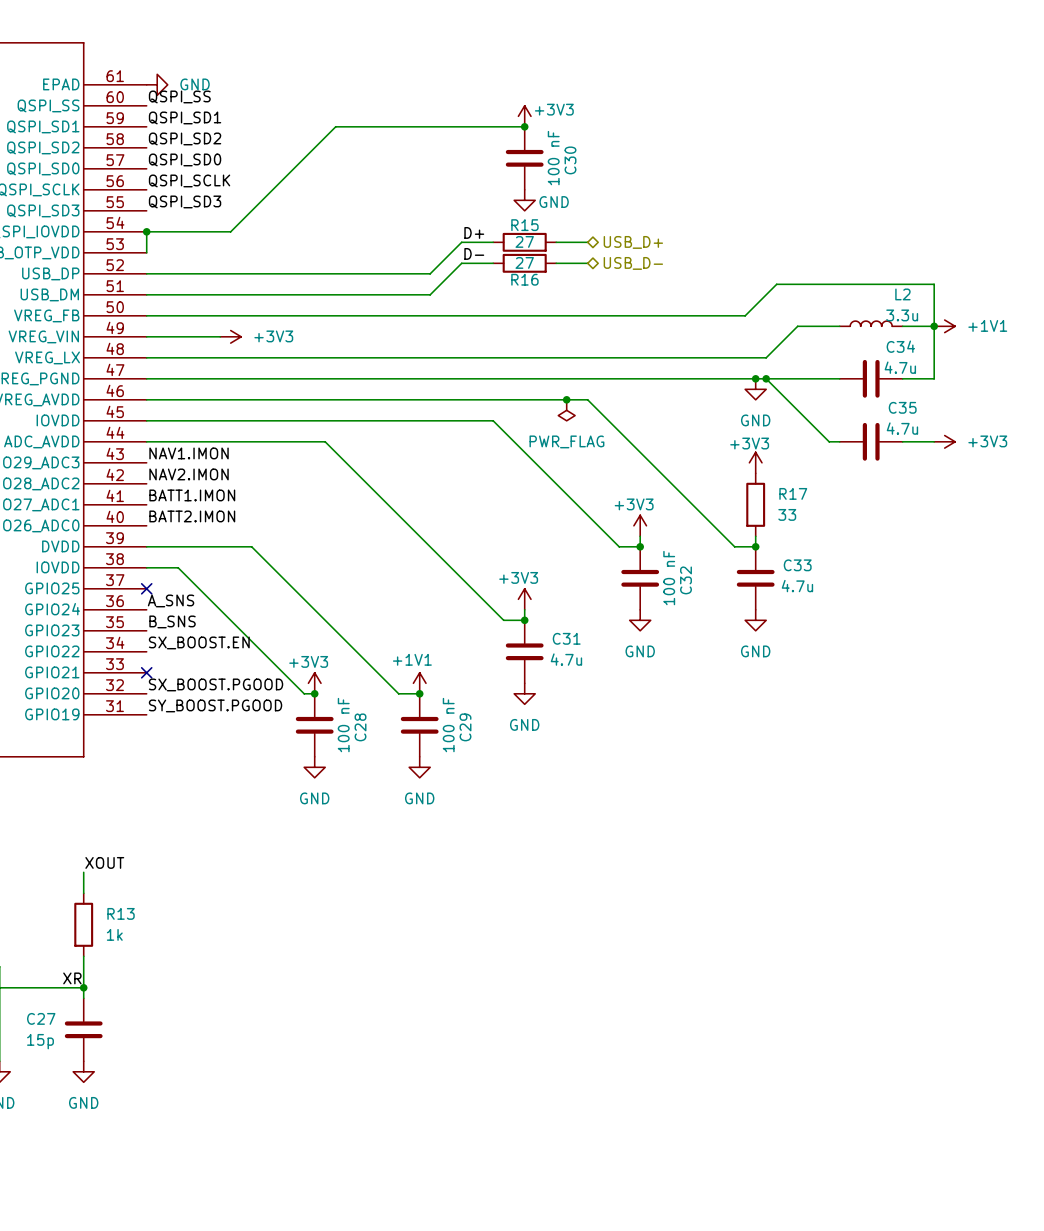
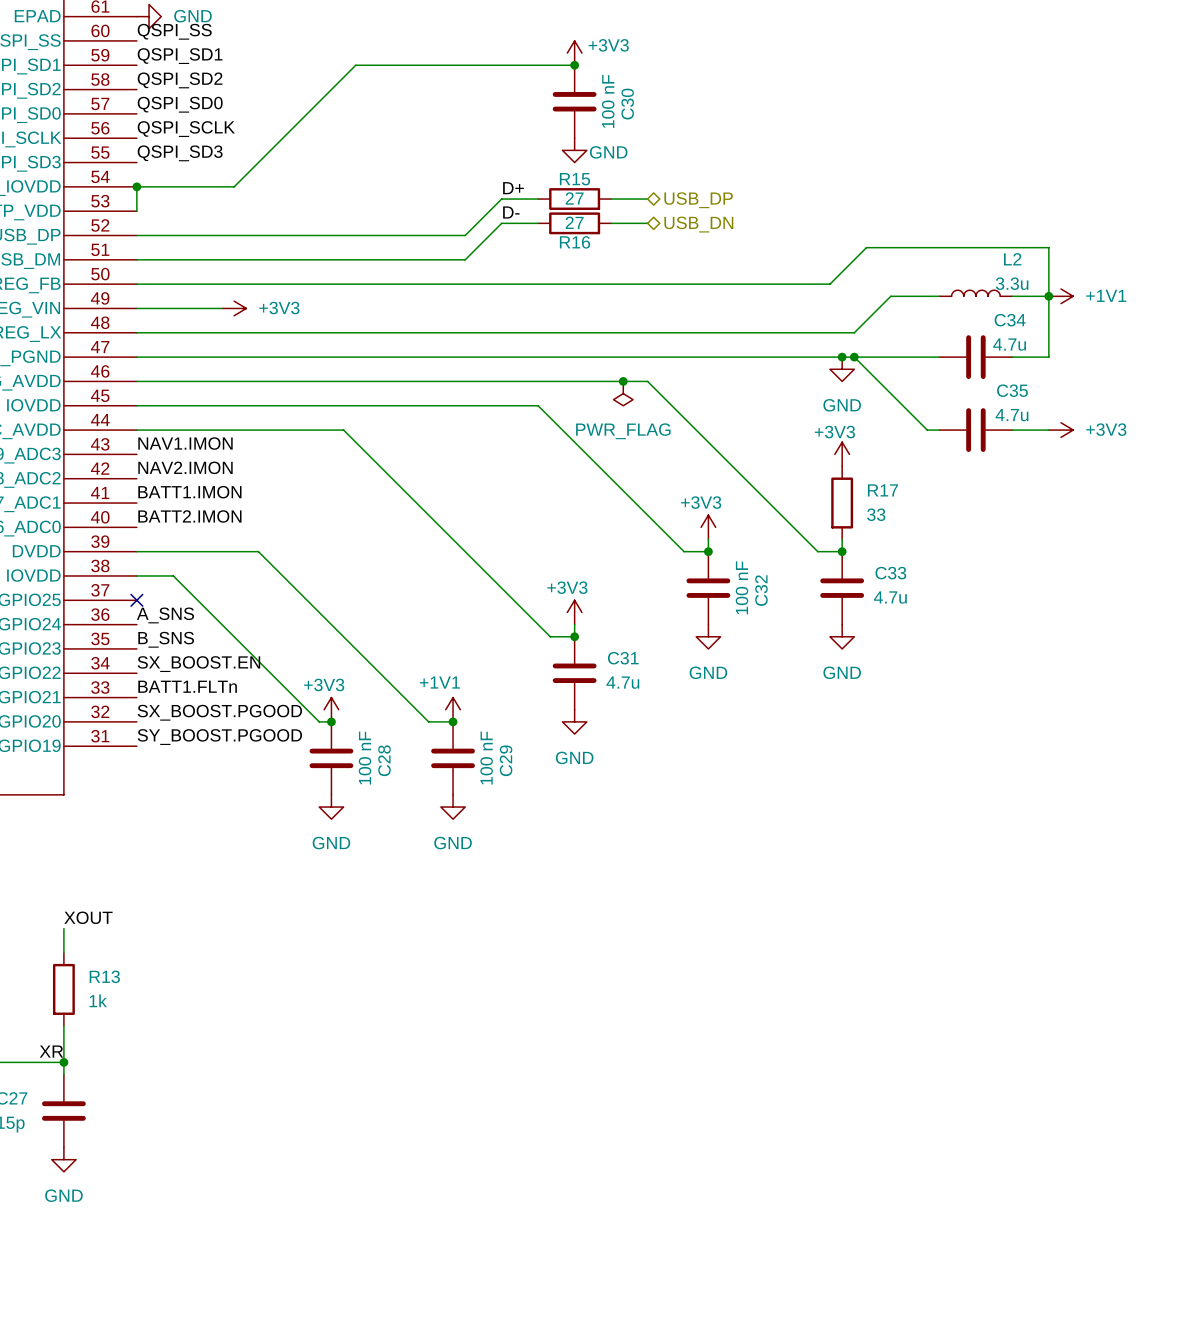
hierarchical label: USB_D+ (633, 242) -> USB_DP (698, 200)
hierarchical label: USB_D- (633, 263) -> USB_DN (698, 224)
label: none -> BATT1.FLTn (187, 686)
no-connect mark: (146, 672) -> none

